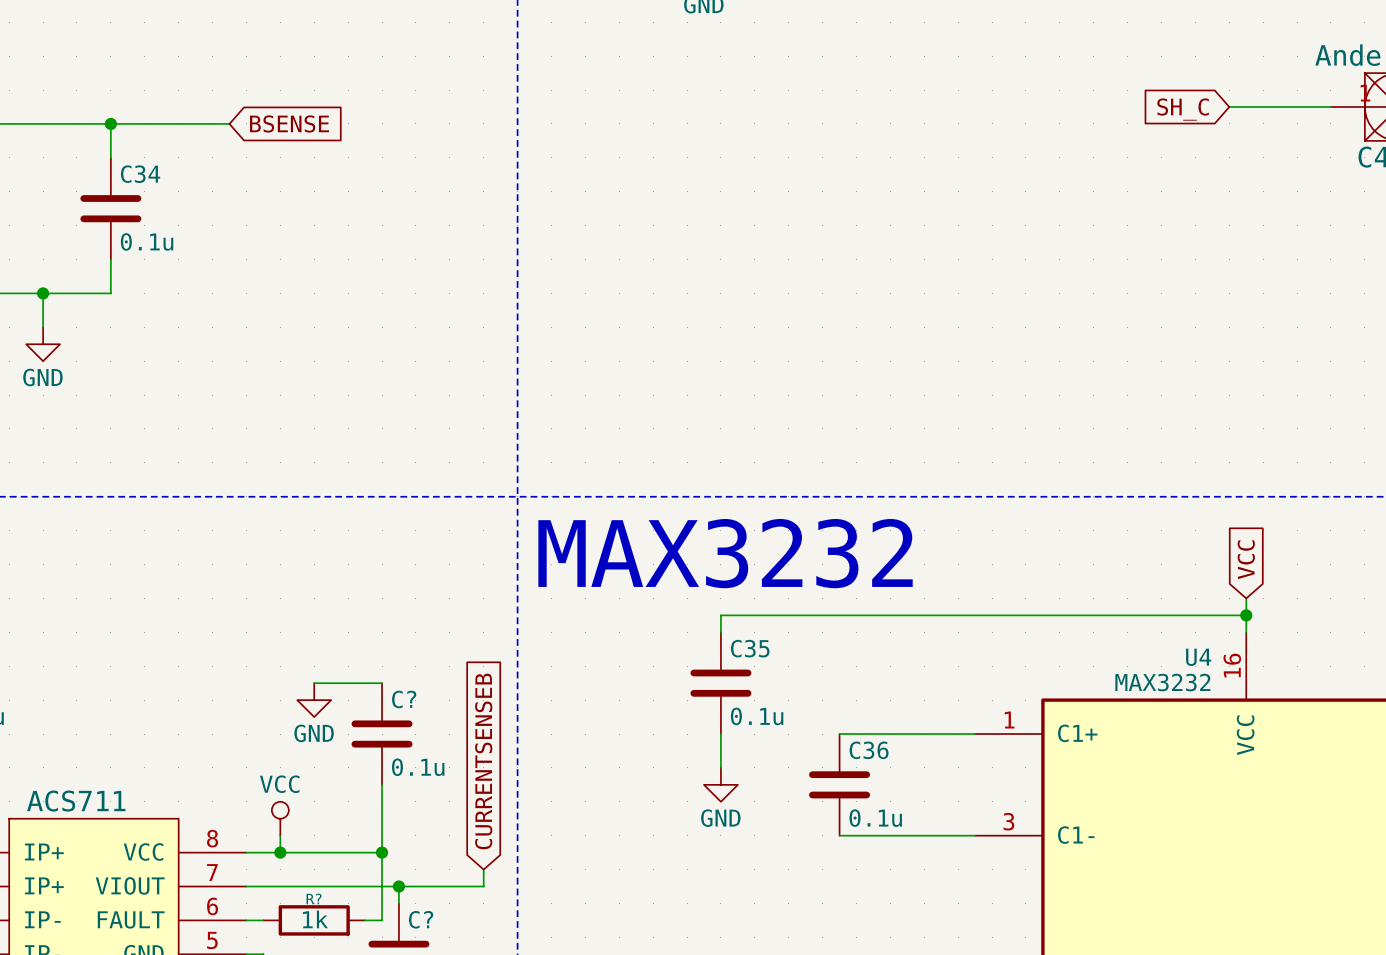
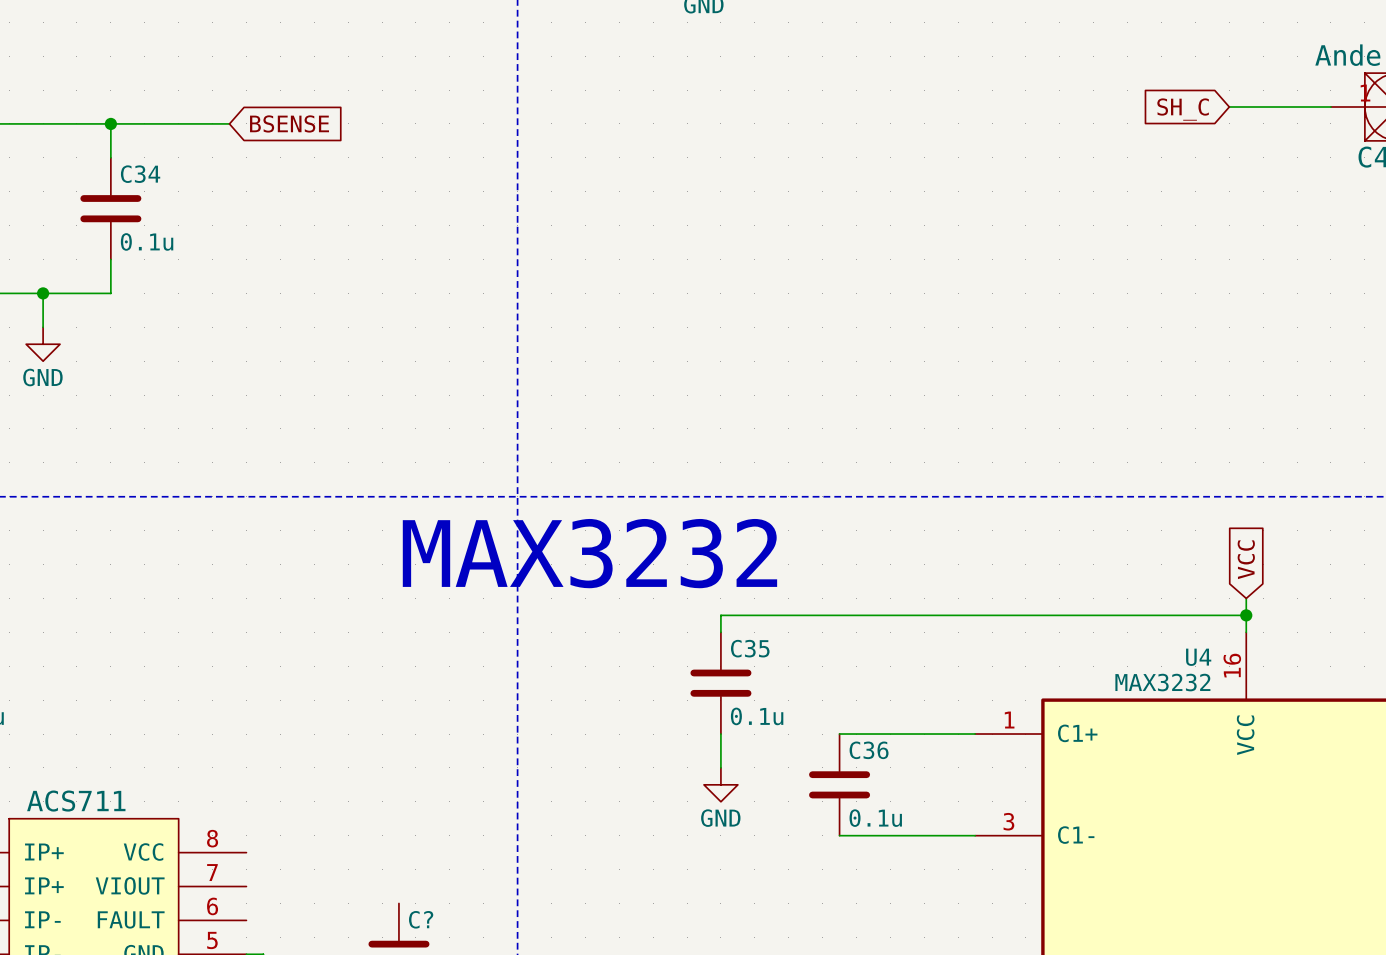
text position: MAX3232 (725, 553) -> MAX3232 (589, 553)
wire: (314, 683) (382, 683) -> none
power symbol: GND (314, 700) -> none
C?: 0.1u (382, 734) -> none
global label: CURRENTSENSEB (483, 761) -> none
wire: (382, 784) (382, 920) (365, 920) -> none
power symbol: VCC (280, 818) -> none
wire: (280, 835) (280, 852) -> none
wire: (246, 852) (382, 852) -> none
junction: (280, 852) -> none
junction: (382, 852) -> none
wire: (483, 869) (483, 886) (246, 886) -> none
wire: (398, 886) (398, 903) -> none
junction: (398, 886) -> none
wire: (246, 920) (263, 920) -> none
R?: 1k (314, 920) -> none

